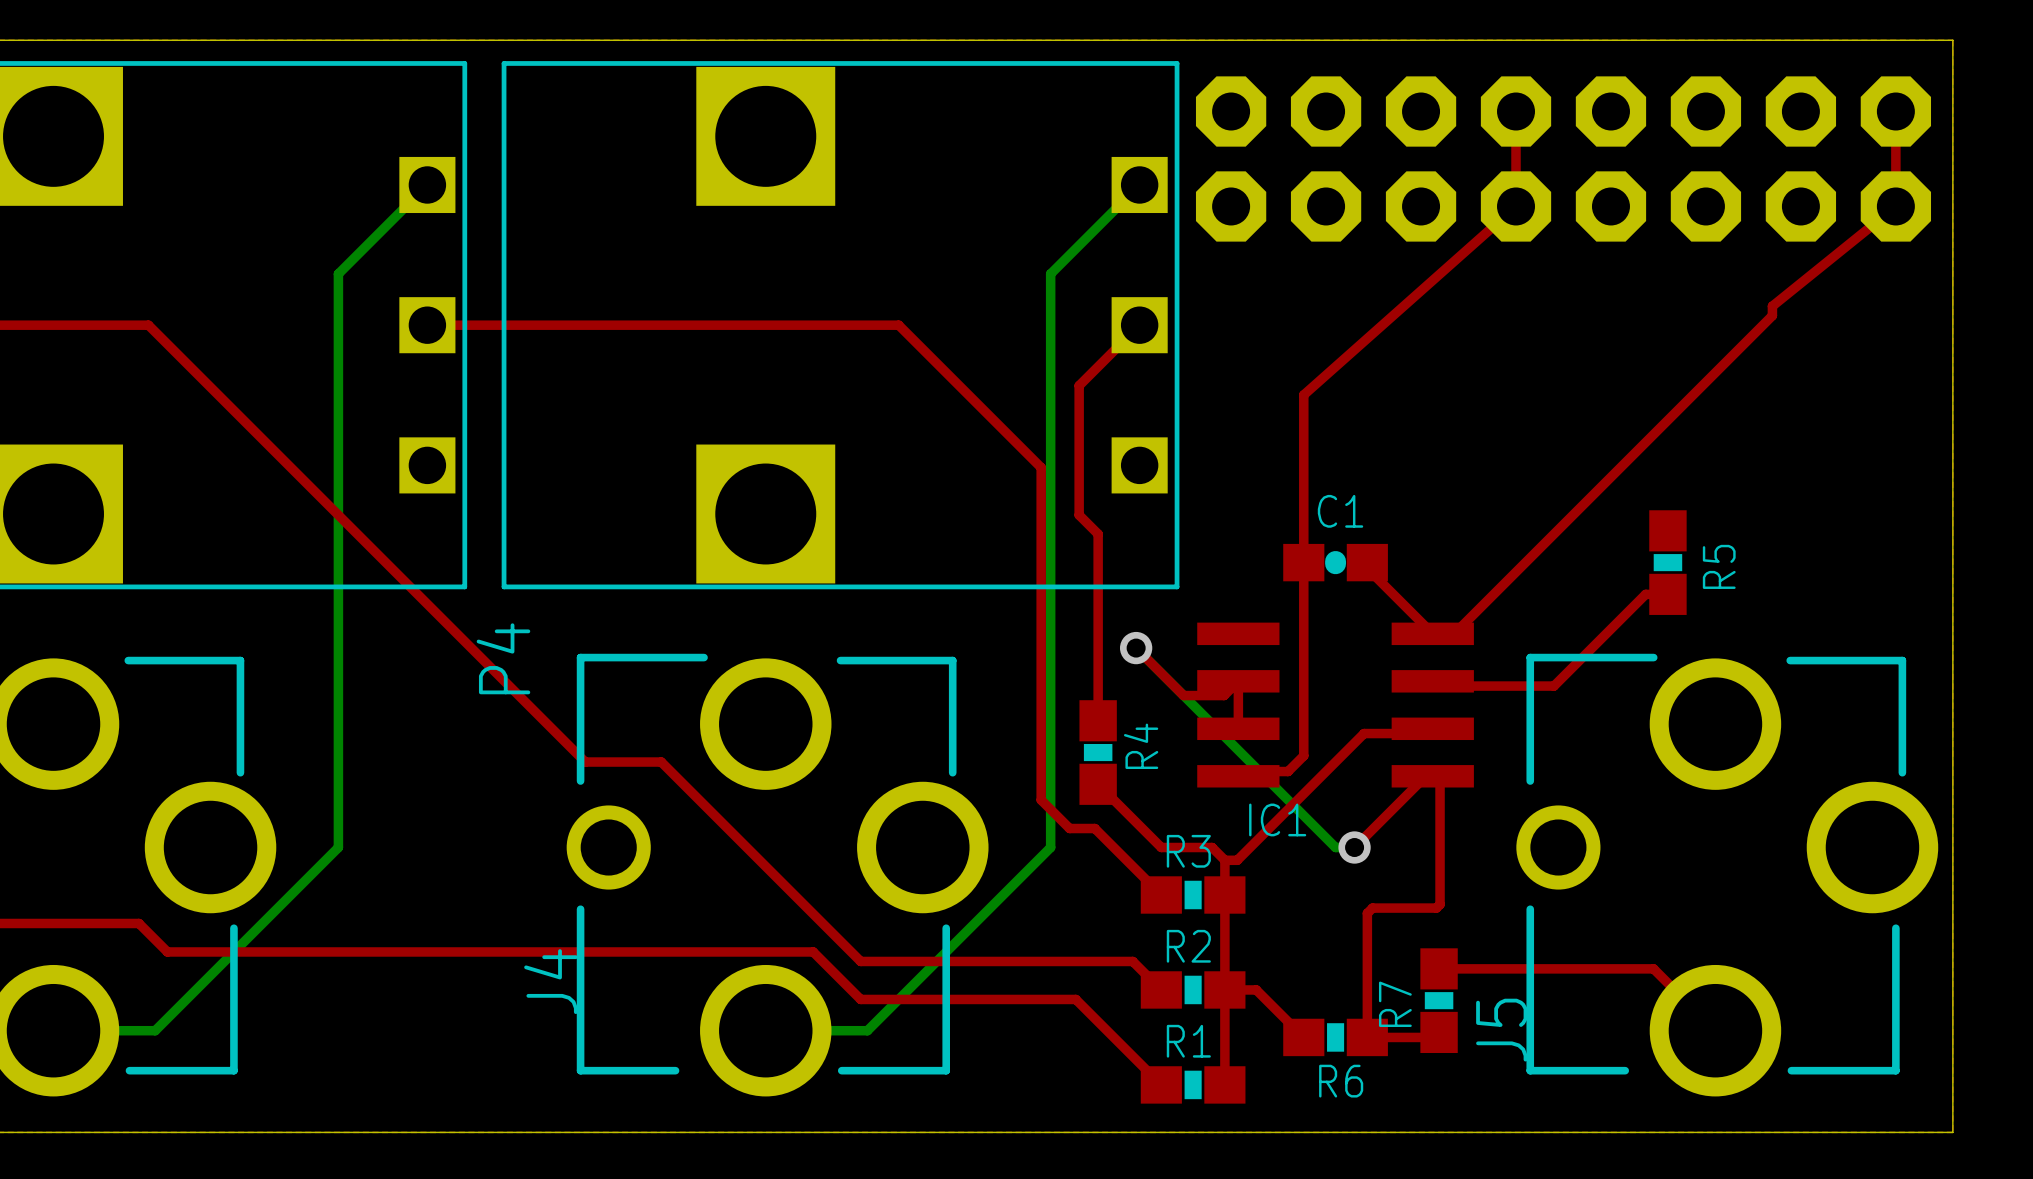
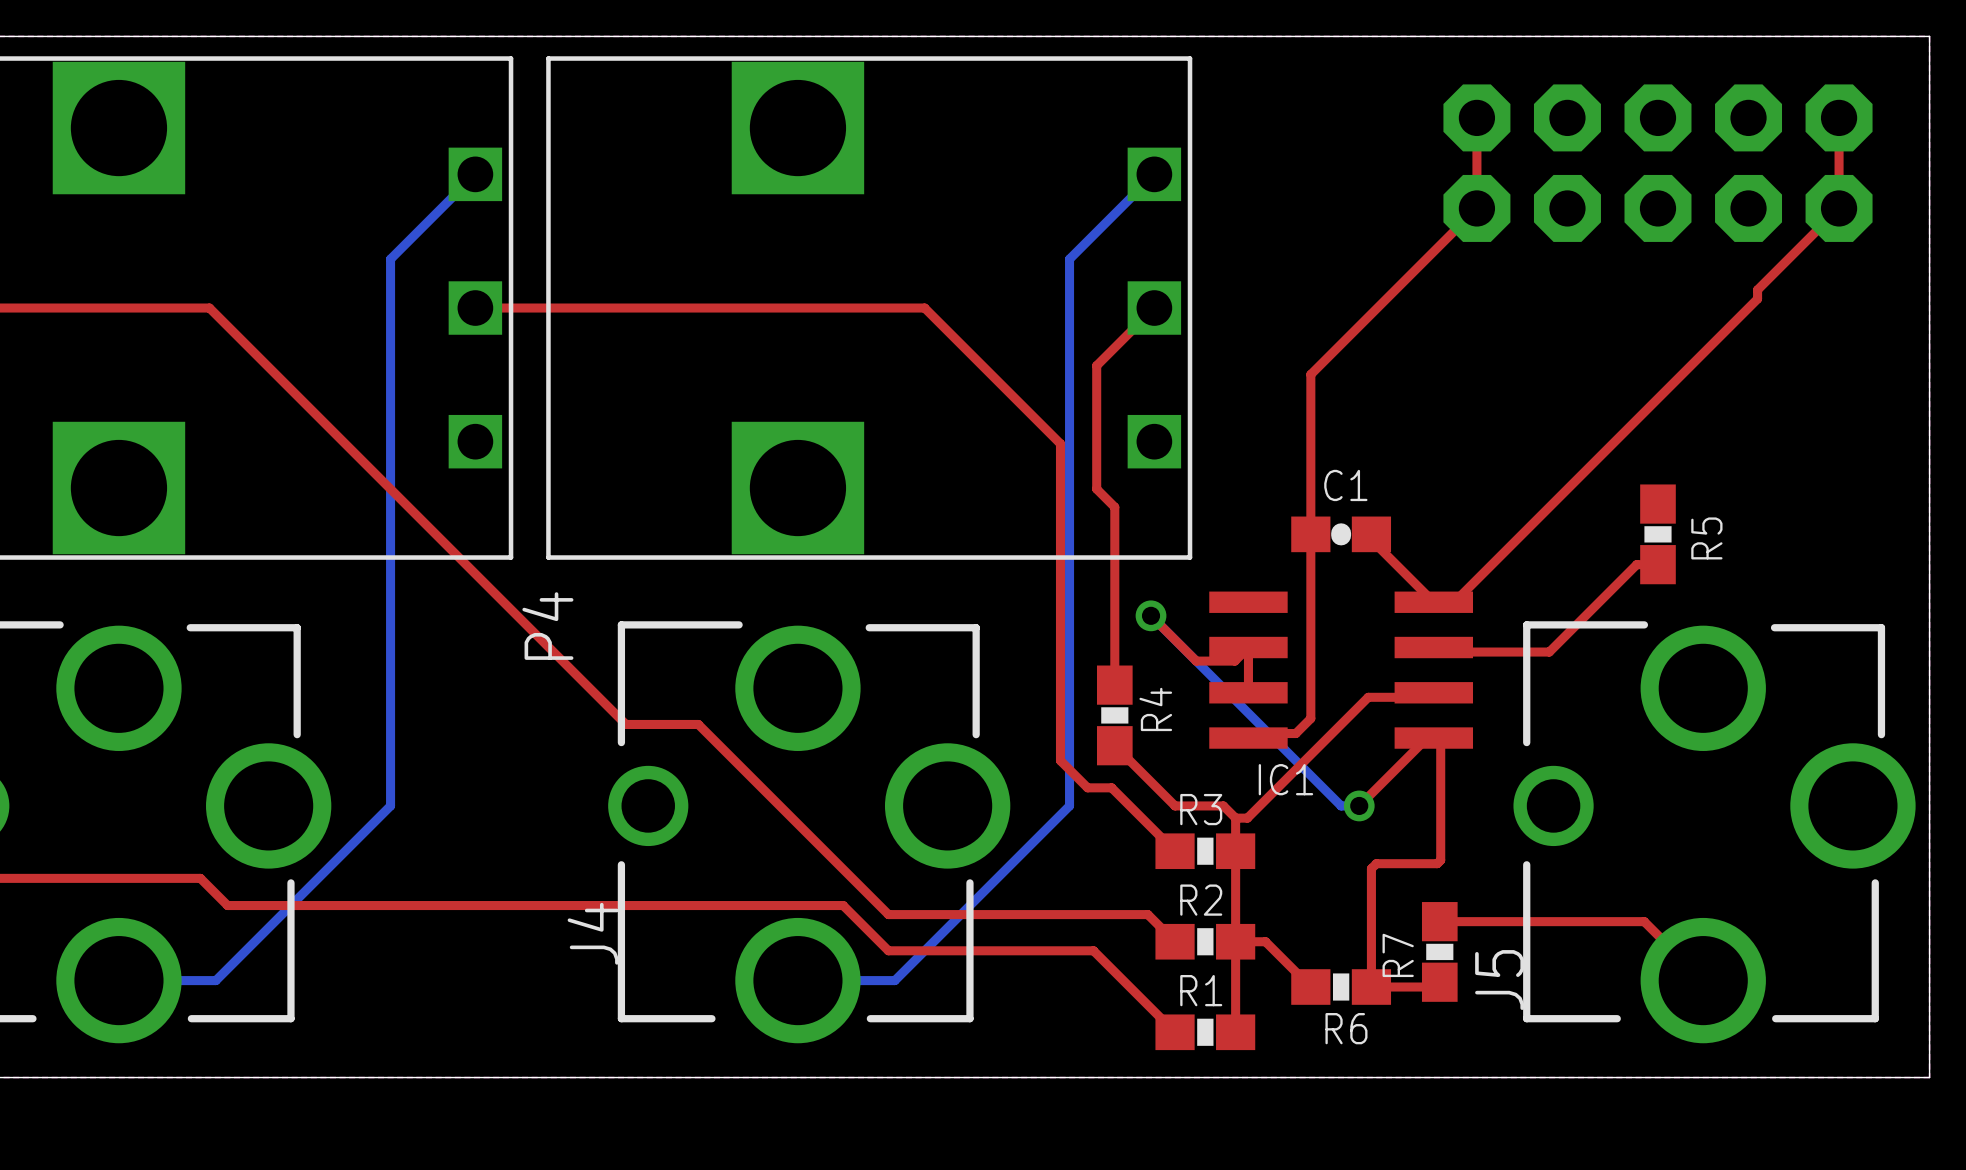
top track: (1516, 111) (1516, 206) (1303, 394) -> (1476, 117) (1476, 208) (1310, 374)
top track: (1895, 111) (1895, 206) (1772, 306) -> (1839, 117) (1839, 208) (1757, 289)
part: (1563, 158) -> none
part: none -> (1657, 163)

